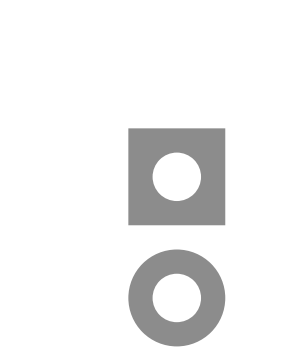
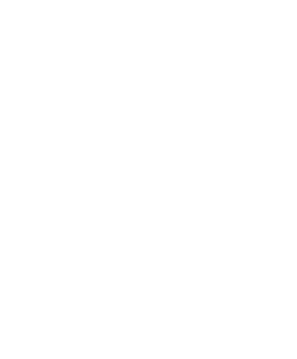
part: (176, 237) -> none

